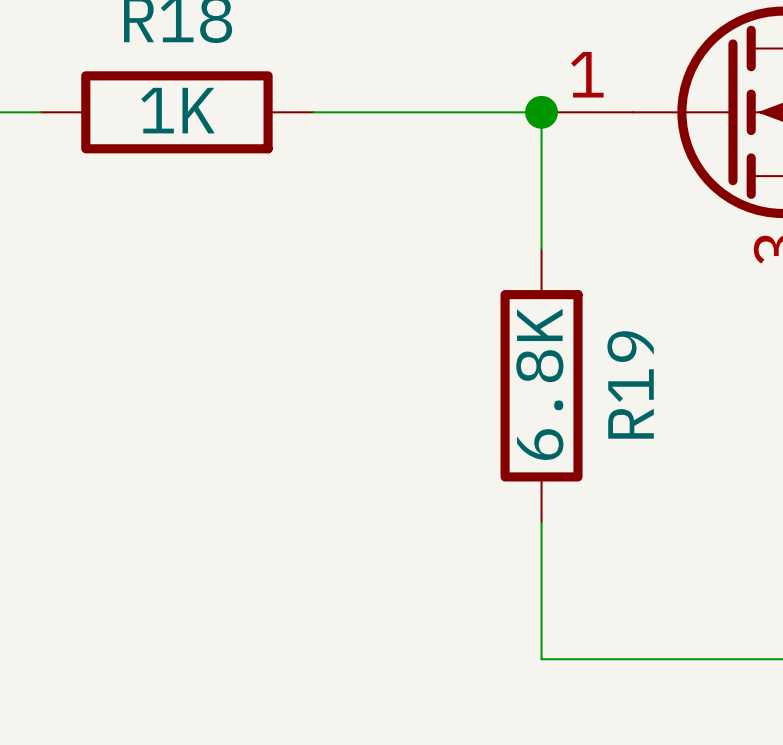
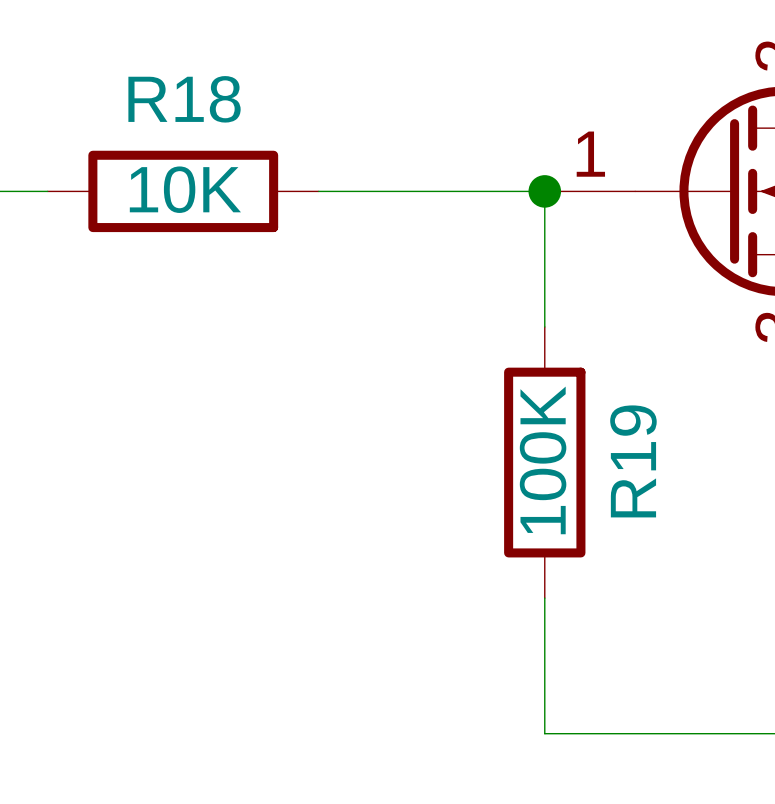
R18 value: 1K (177, 110) -> 10K (185, 189)
R19 value: 6.8K (539, 384) -> 100K (543, 460)

